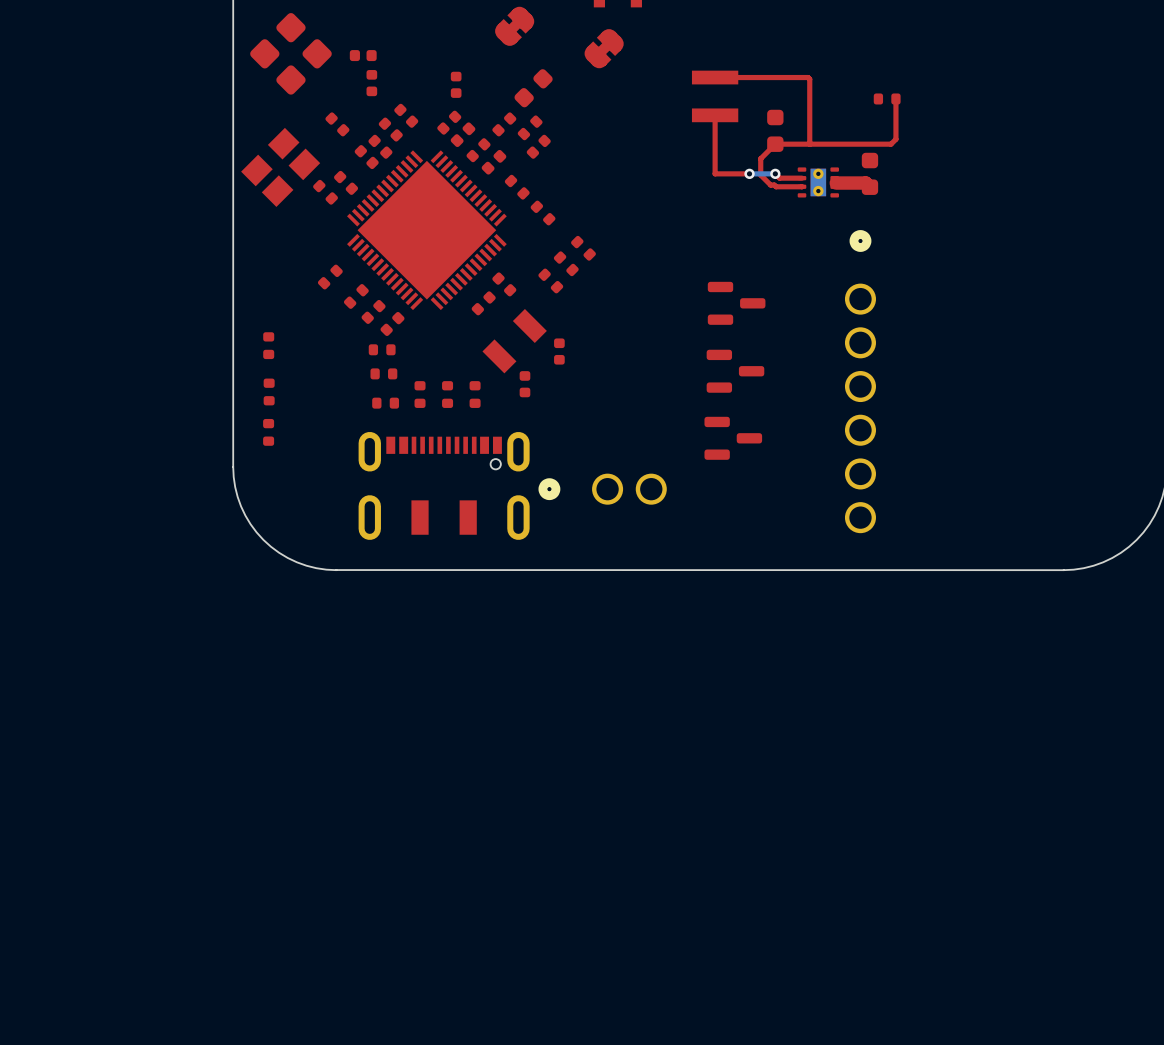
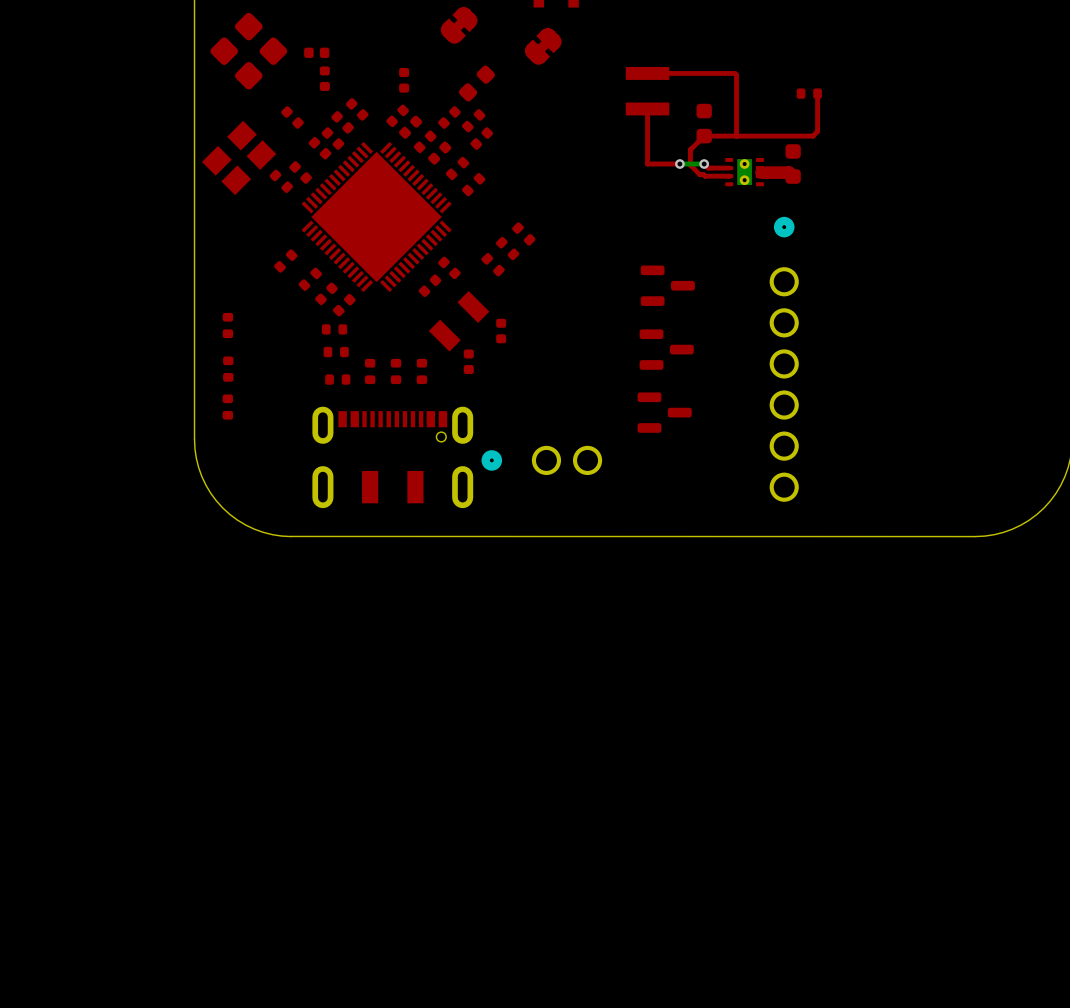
part: none -> (457, 168)
part: (517, 187) -> none
part: none -> (473, 184)
part: (543, 213) -> none

